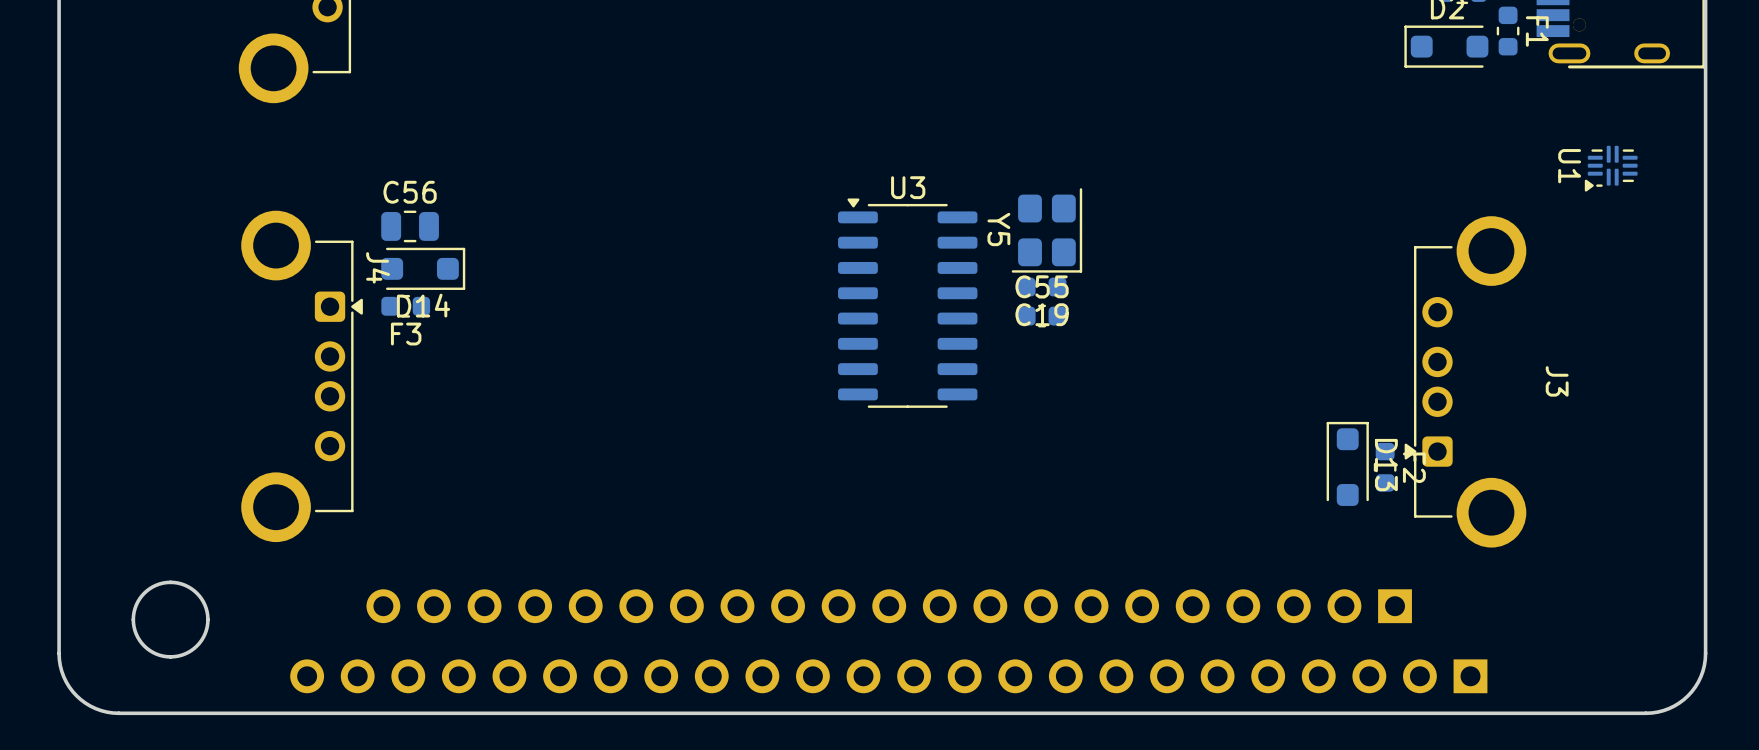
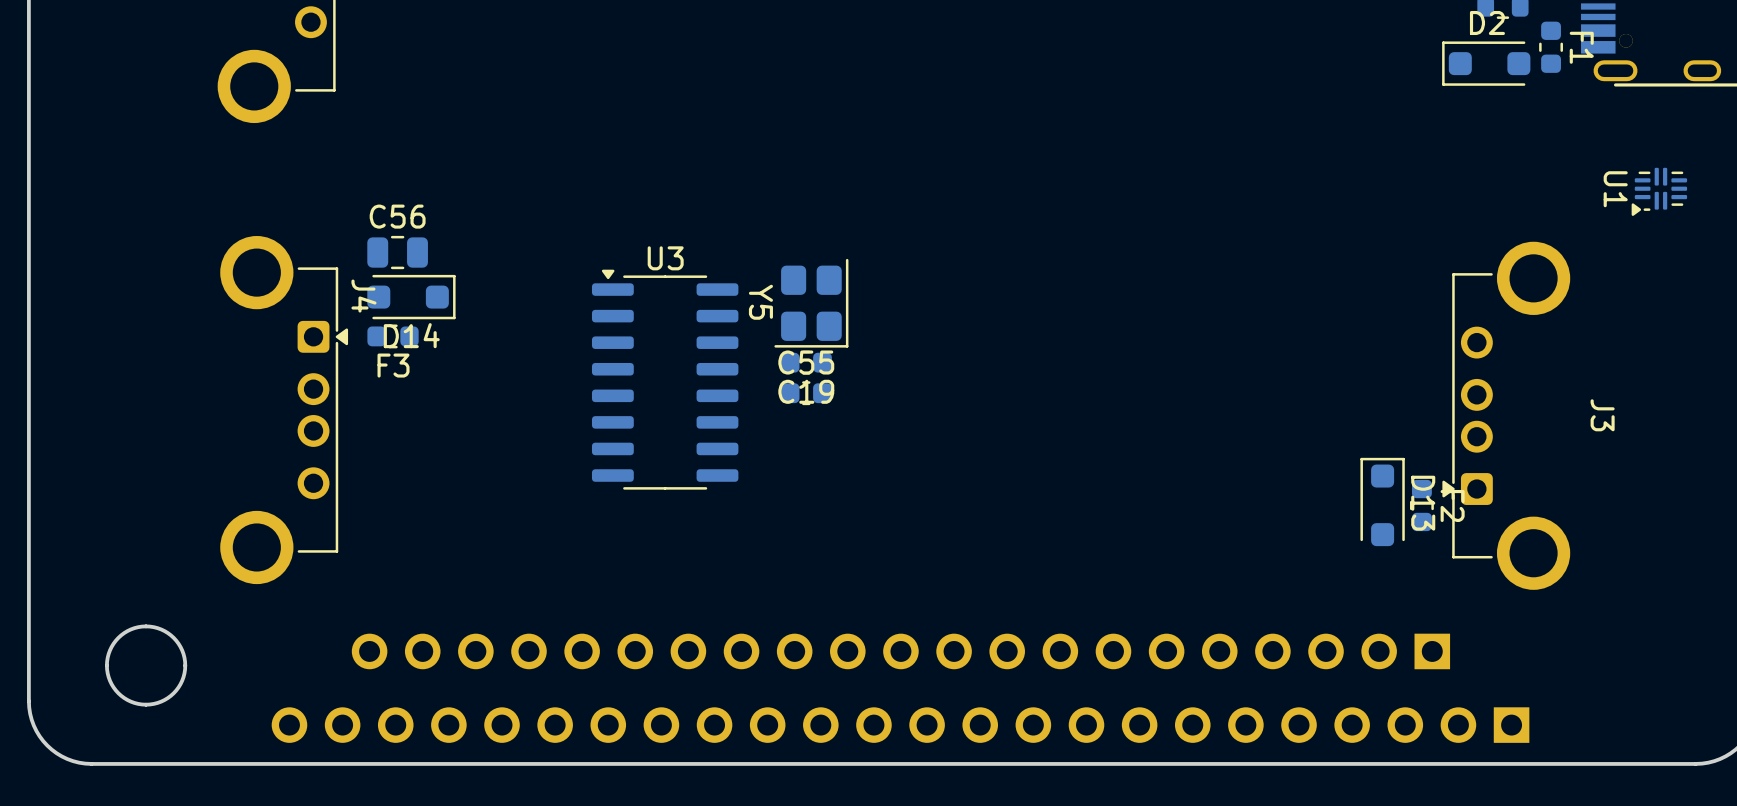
Y5 position: (1046, 230) -> (811, 303)
C19 position: (1042, 286) -> (806, 362)
U3 position: (907, 303) -> (665, 379)
C55 position: (1042, 316) -> (806, 393)

